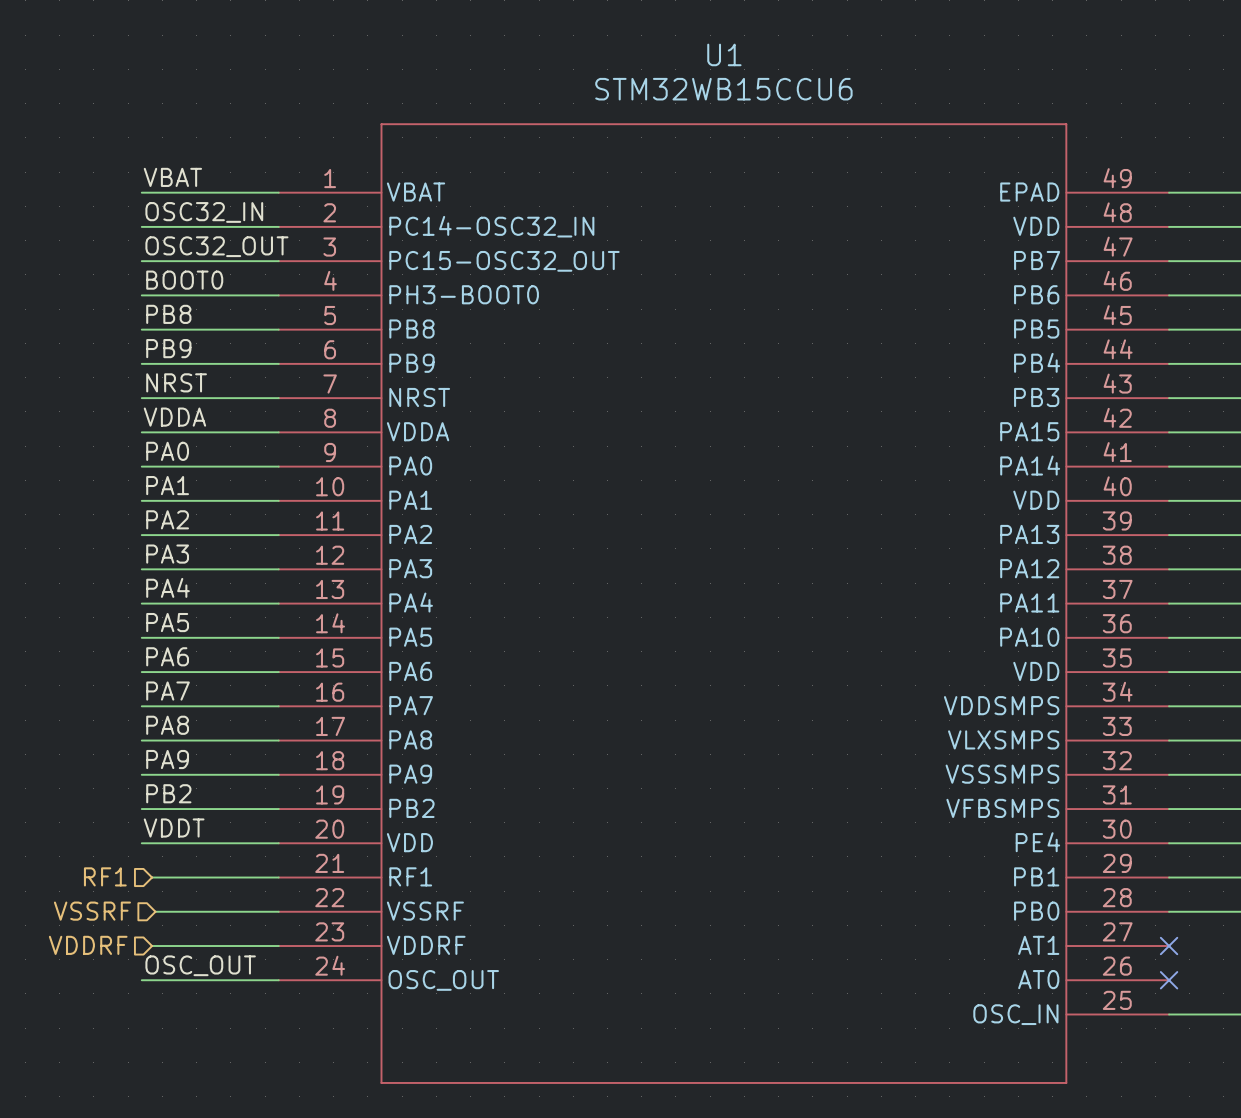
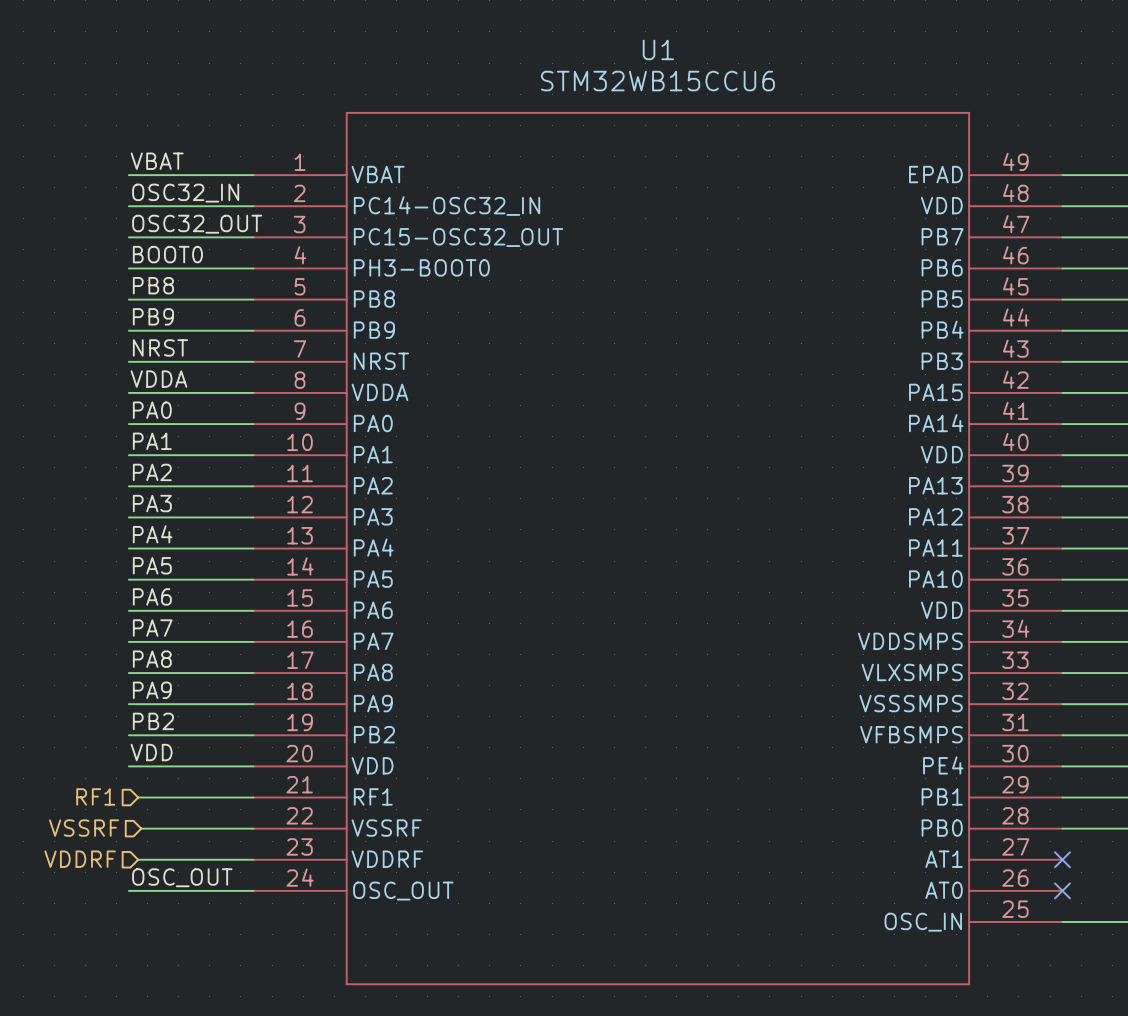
label: VDDT (174, 828) -> VDD (151, 752)

